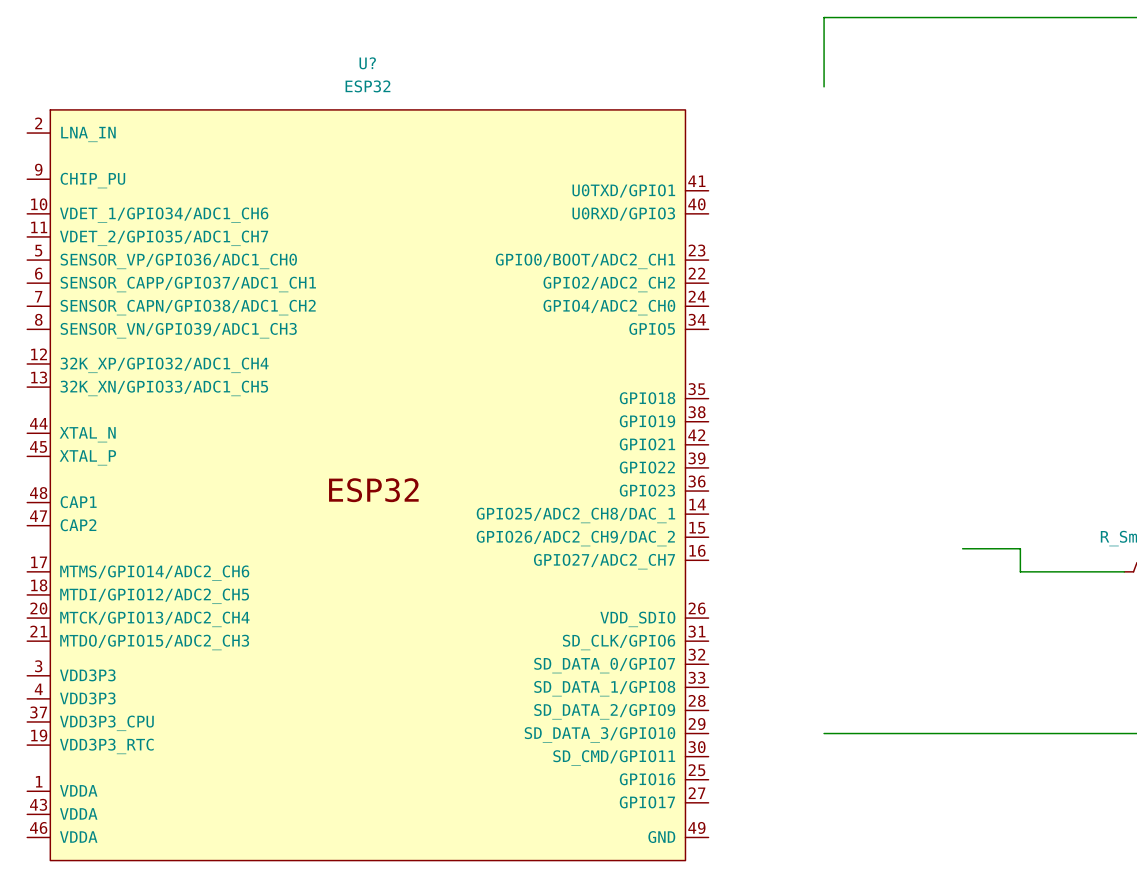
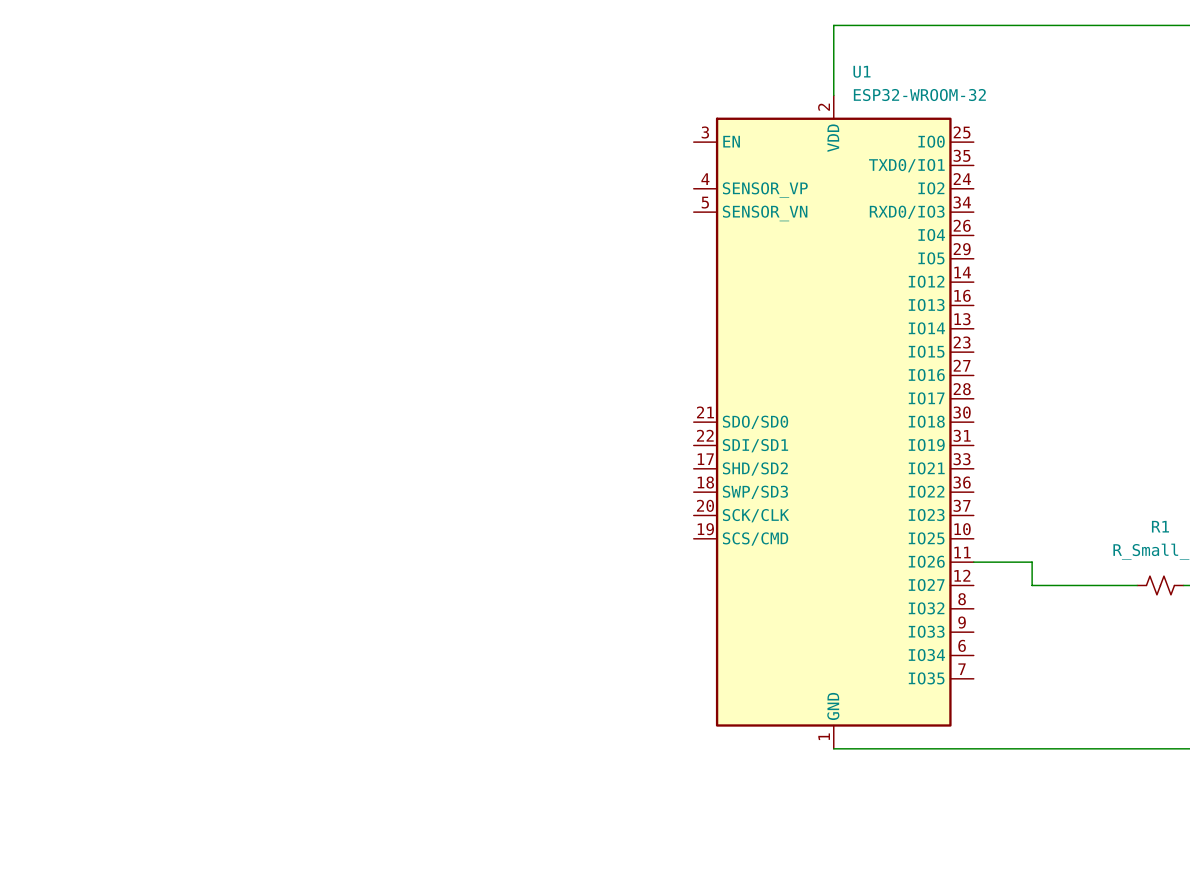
U1: none -> ESP32-WROOM-32 (833, 422)
U?: ESP32 (367, 485) -> none

